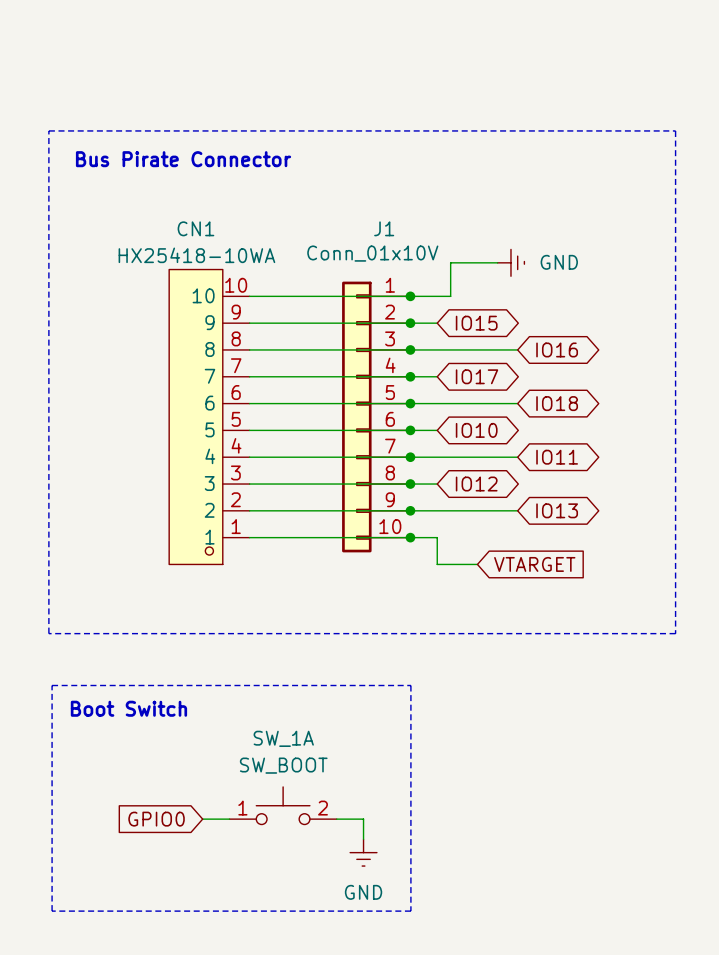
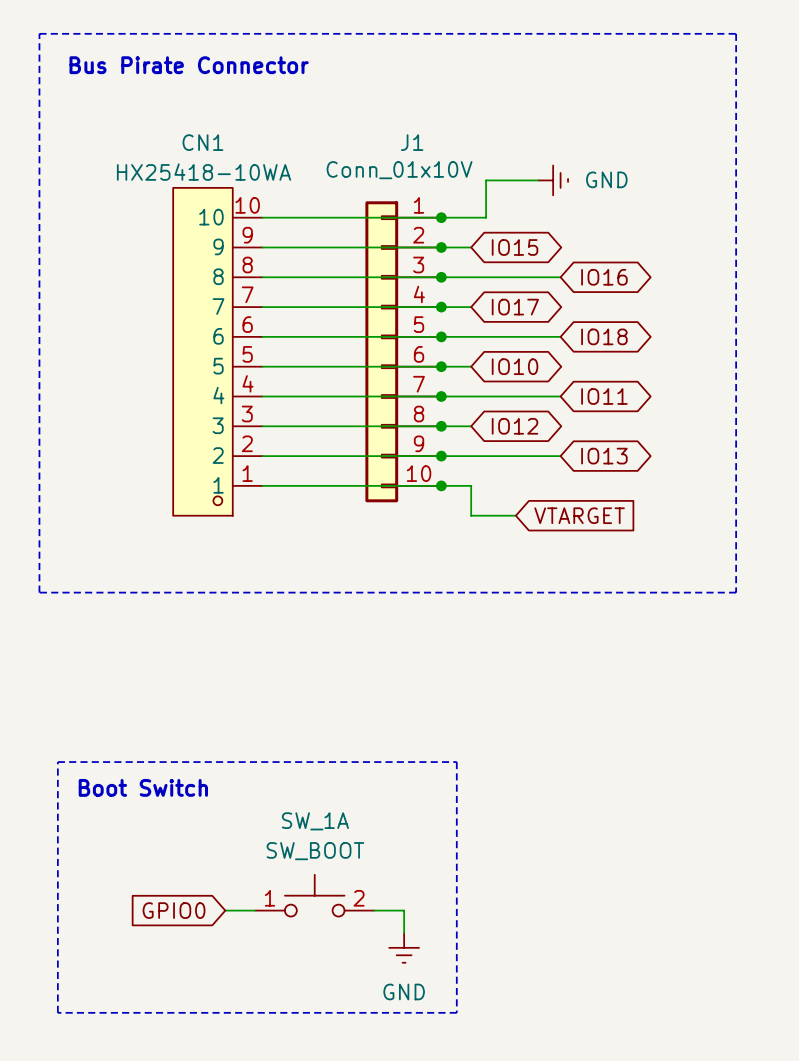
line: (48, 130) (675, 130) (675, 633) (48, 633) (48, 130) -> (39, 33) (736, 33) (736, 592) (39, 592) (39, 33)
text position: Bus Pirate Connector (183, 159) -> Bus Pirate Connector (189, 65)
junction: none -> (441, 217)
junction: none -> (441, 247)
junction: none -> (441, 277)
wire: (497, 262) (450, 262) (450, 296) (249, 296) -> (538, 180) (486, 180) (486, 217) (262, 217)
power symbol position: GND (510, 262) -> GND (553, 180)
junction: none -> (441, 307)
junction: (410, 296) -> none
junction: none -> (441, 336)
wire: (249, 323) (437, 323) -> (262, 247) (471, 247)
junction: (410, 323) -> none
global label position: IO15 (476, 323) -> IO15 (515, 247)
junction: none -> (441, 366)
wire: (249, 349) (517, 349) -> (262, 277) (560, 277)
junction: (410, 349) -> none
global label position: IO16 (557, 349) -> IO16 (604, 277)
junction: none -> (441, 396)
wire: (249, 376) (437, 376) -> (262, 307) (471, 307)
junction: (410, 376) -> none
global label position: IO17 (477, 376) -> IO17 (515, 307)
junction: none -> (441, 426)
wire: (249, 403) (517, 403) -> (262, 336) (560, 336)
junction: (410, 403) -> none
global label position: IO18 (557, 403) -> IO18 (604, 336)
junction: none -> (441, 456)
CN1 position: (209, 416) -> (217, 351)
J1 position: (376, 416) -> (403, 351)
wire: (249, 430) (437, 430) -> (262, 366) (471, 366)
junction: (410, 430) -> none
global label position: IO10 (476, 430) -> IO10 (515, 366)
junction: none -> (441, 485)
wire: (249, 457) (517, 457) -> (262, 396) (560, 396)
junction: (410, 457) -> none
global label position: IO11 (557, 457) -> IO11 (604, 396)
wire: (249, 484) (437, 484) -> (262, 426) (471, 426)
junction: (410, 484) -> none
global label position: IO12 (476, 484) -> IO12 (515, 426)
wire: (249, 510) (517, 510) -> (262, 456) (560, 456)
junction: (410, 510) -> none
global label position: IO13 (557, 510) -> IO13 (604, 456)
wire: (249, 537) (437, 537) (437, 564) (477, 564) -> (262, 485) (471, 485) (471, 515) (515, 515)
junction: (410, 537) -> none
global label position: VTARGET (534, 564) -> VTARGET (579, 515)

